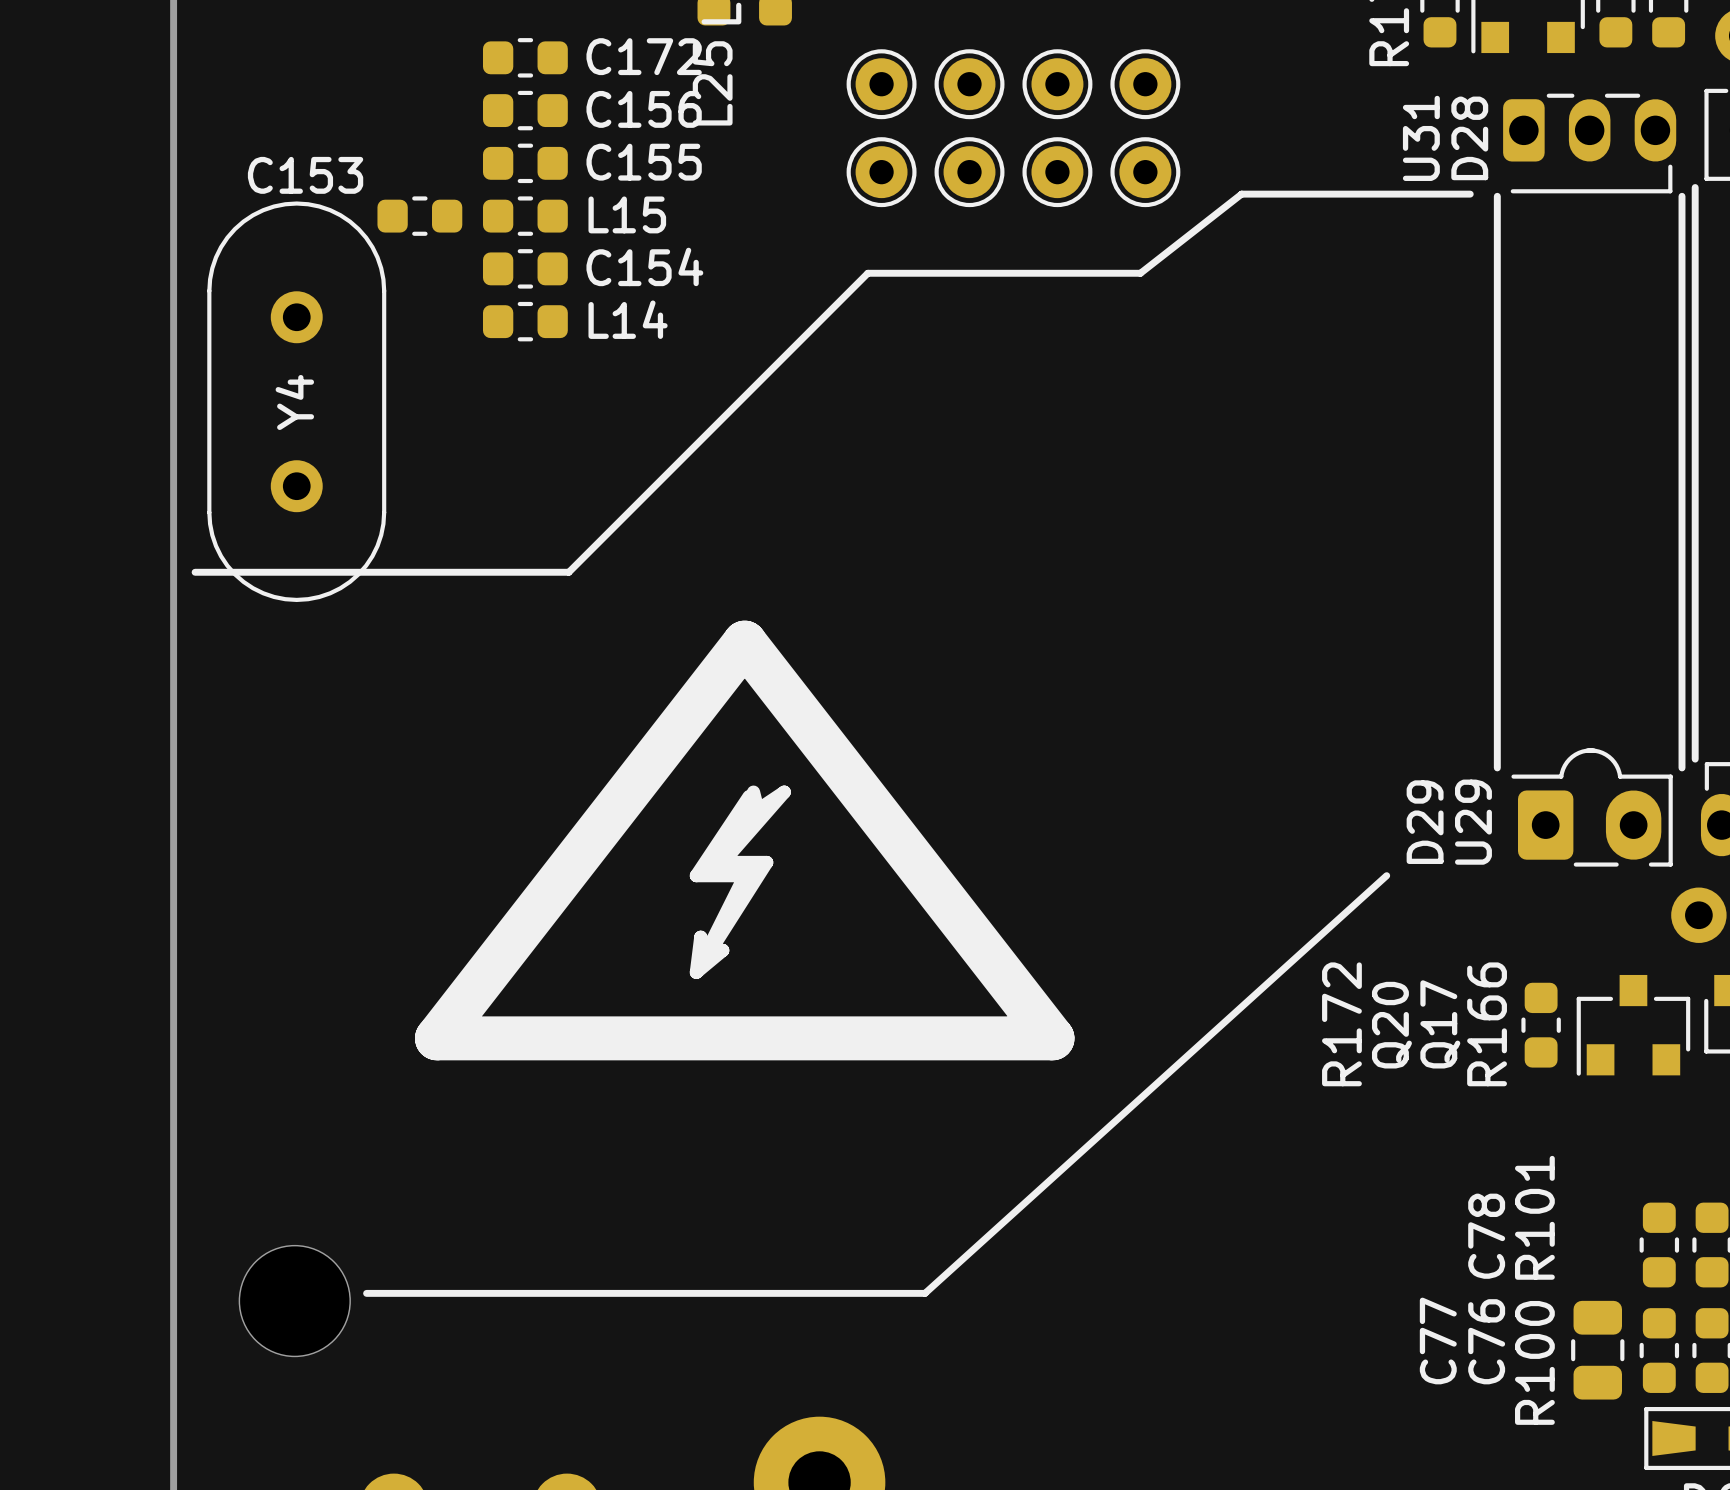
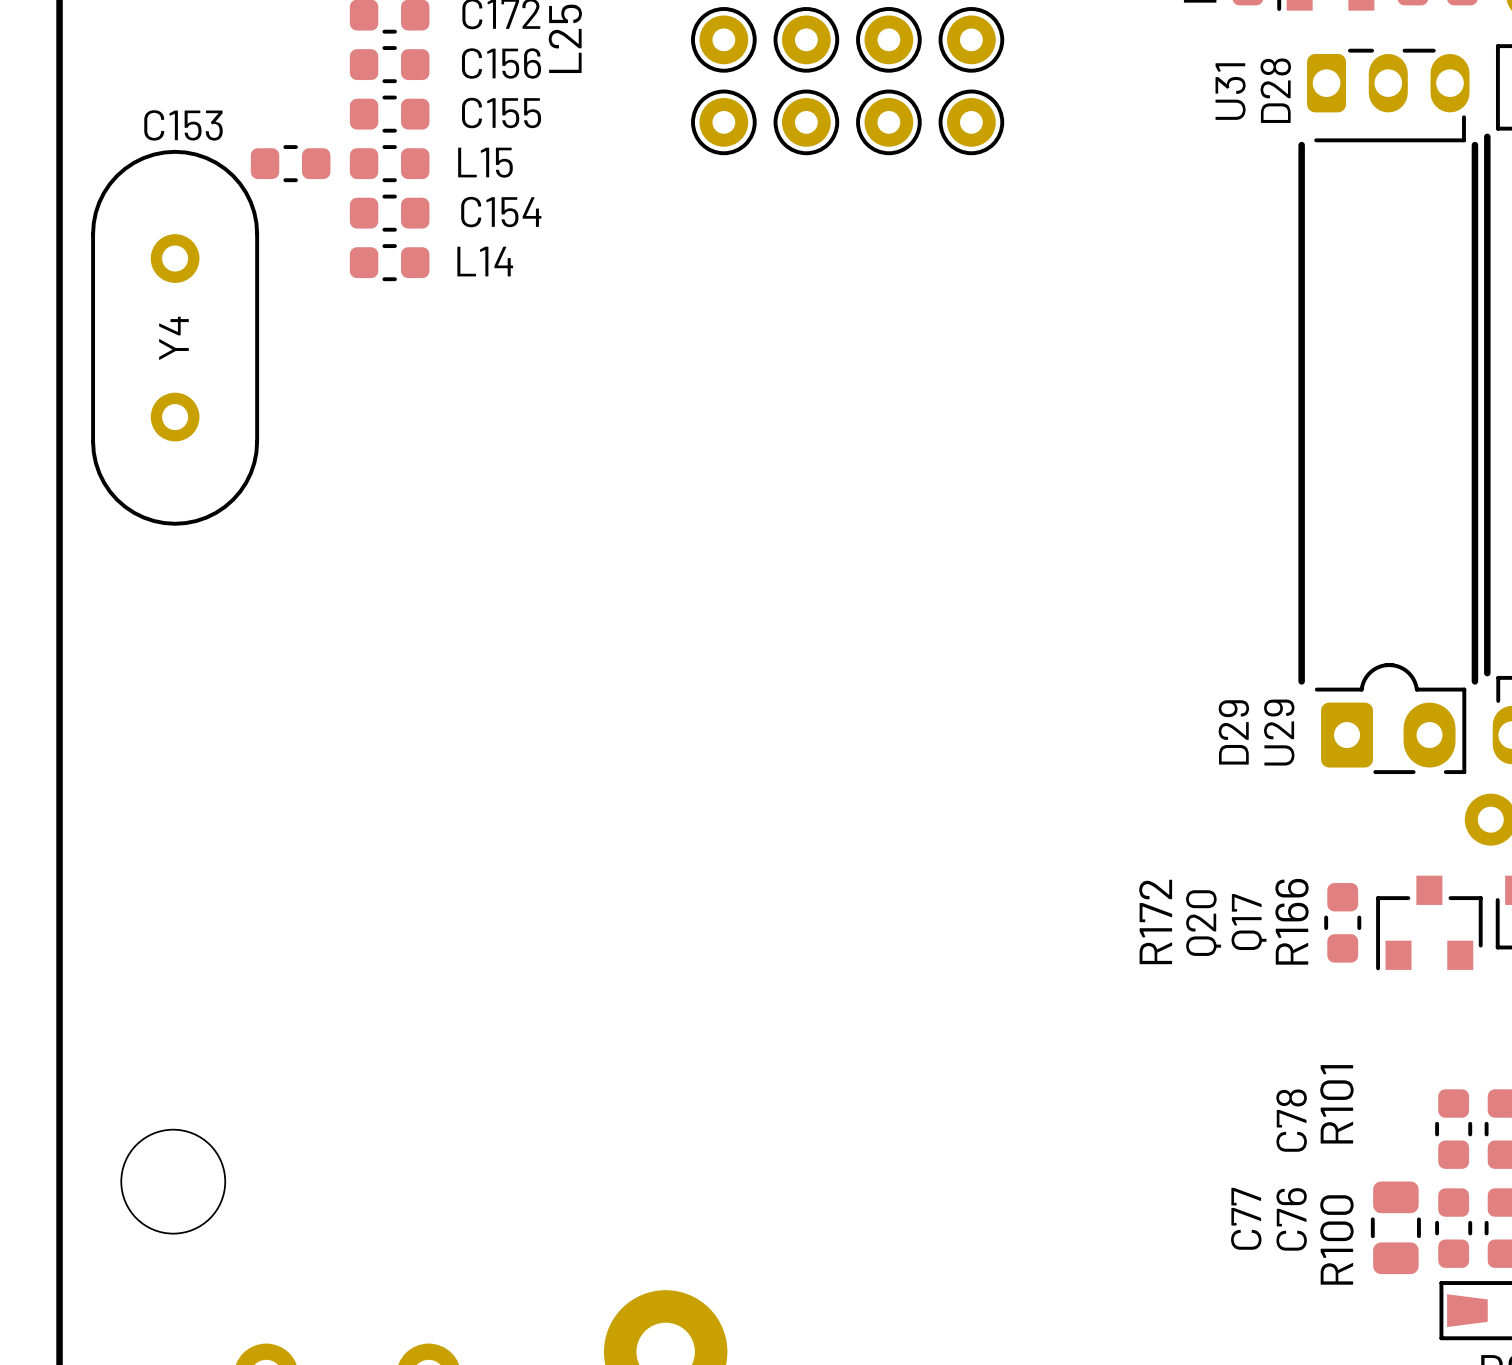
line: (1470, 194) (1241, 194) (1140, 273) (867, 273) (568, 572) (195, 572) -> none
drawing: [414, 620, 1075, 1061] -> none
line: (1386, 875) (925, 1293) (366, 1293) -> none

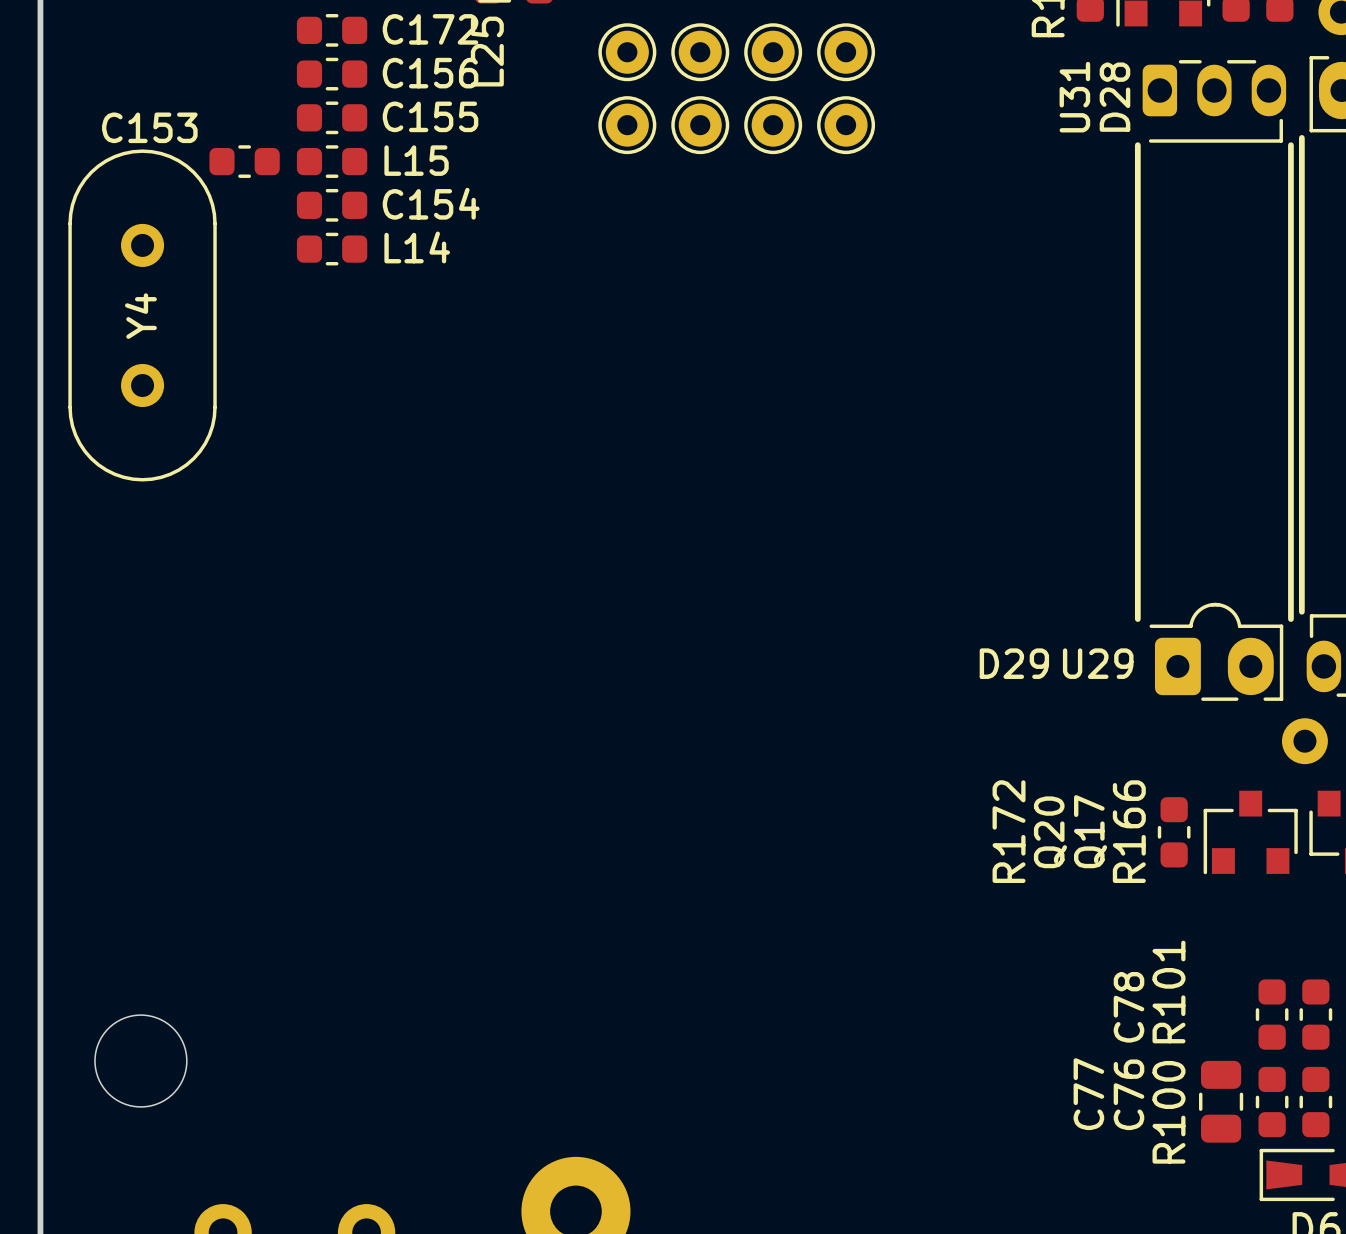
D29 name rotation: 0° (1233, 732) -> 90° clockwise (1014, 663)
U29 name rotation: 0° (1279, 732) -> 90° clockwise (1098, 663)

